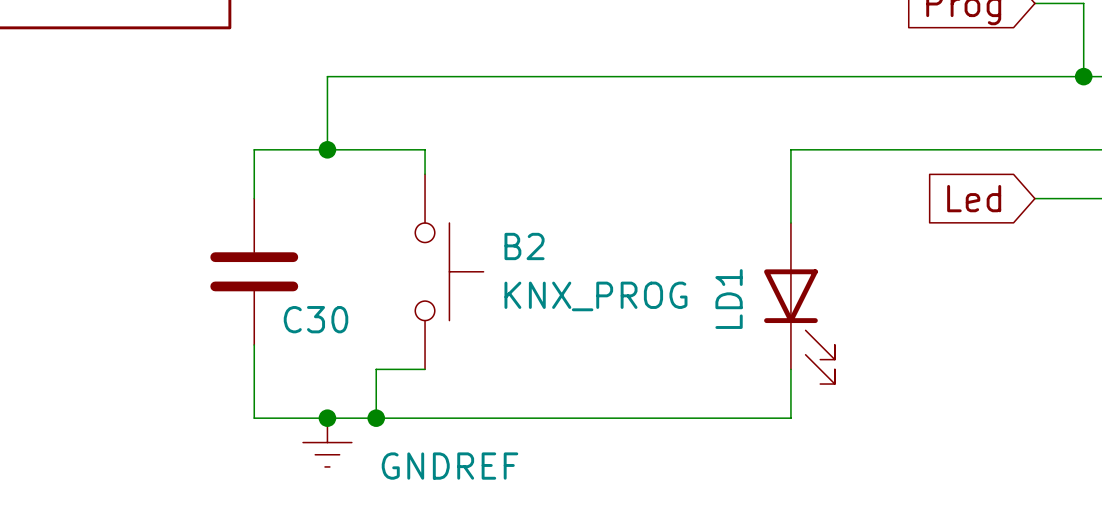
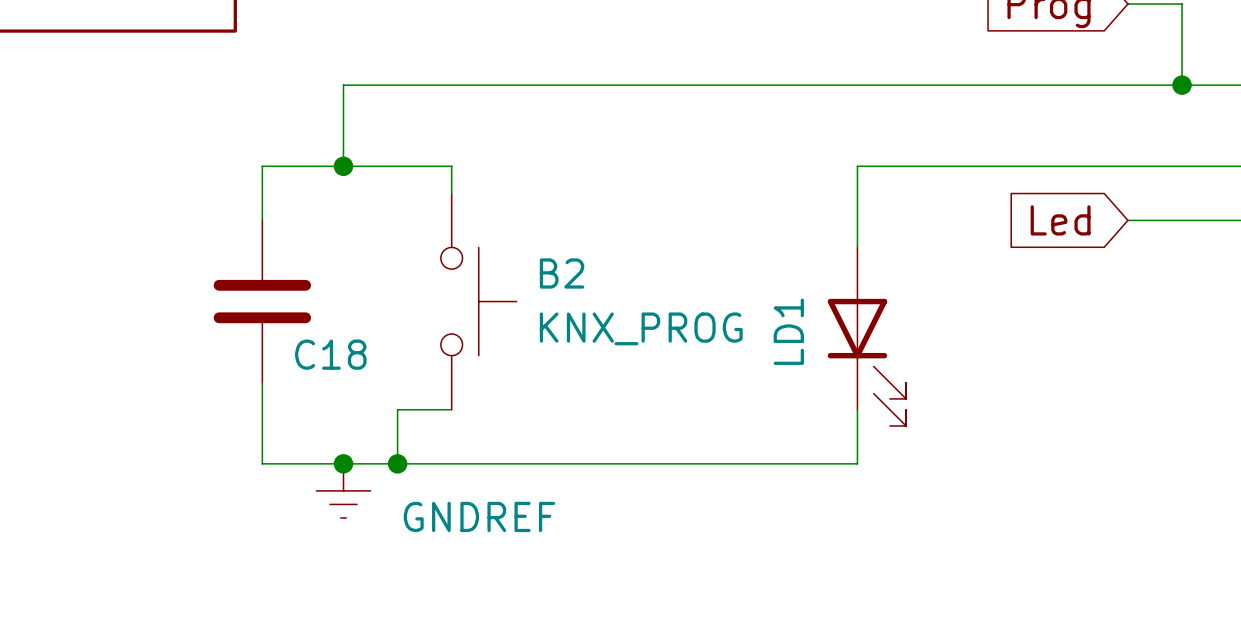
C30 name: C30 (316, 319) -> C18 (330, 354)

